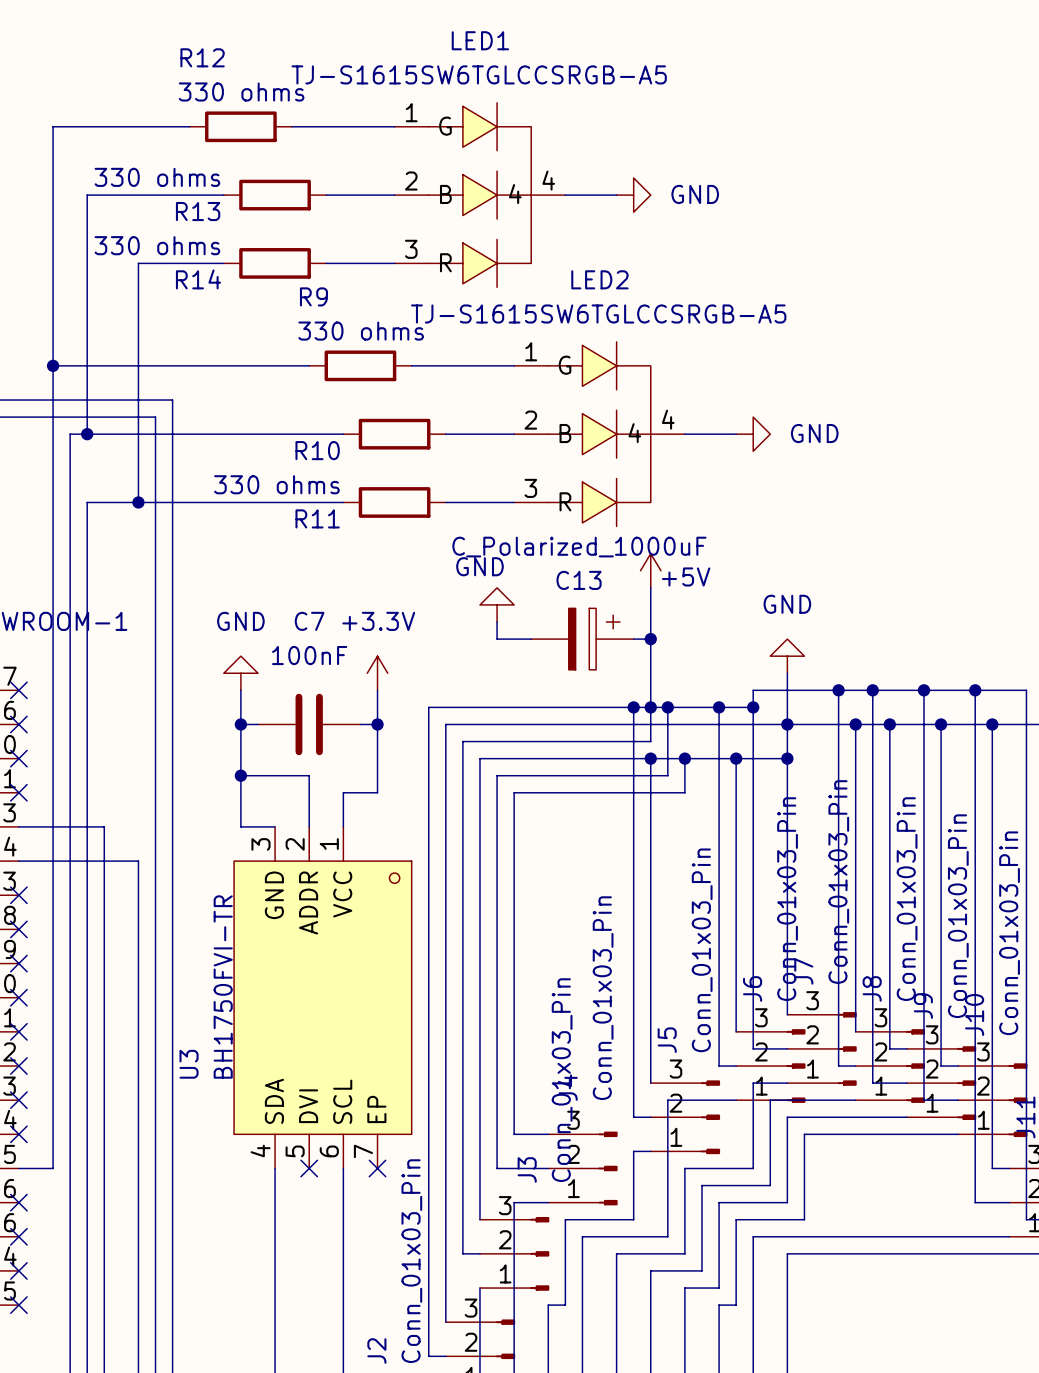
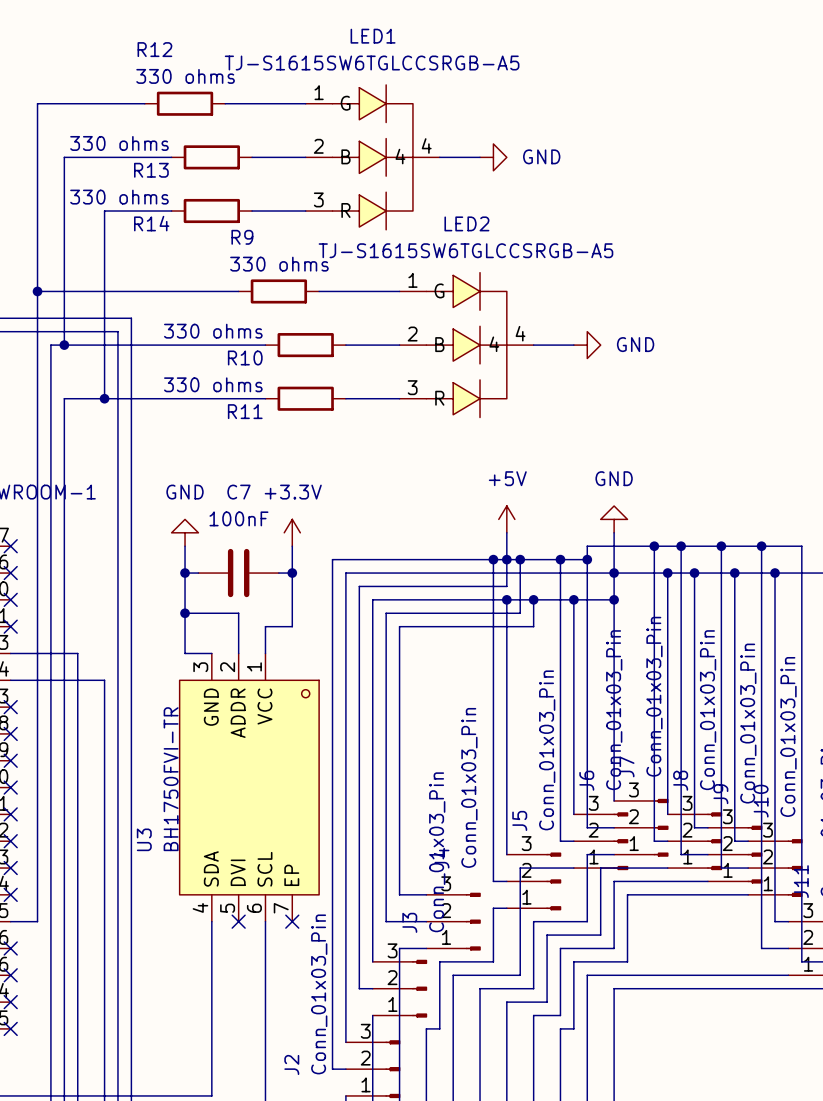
R10 value: none -> 330 ohms (213, 331)
power symbol position: +5V (650, 570) -> +5V (506, 519)
power symbol text position: +5V (686, 576) -> +5V (507, 478)
wire: (650, 587) (650, 673) -> none
power symbol: GND (497, 604) -> none
wire: (497, 622) (497, 639) (531, 639) -> none
C13: C_Polarized_1000uF (582, 639) -> none
wire: (633, 639) (650, 639) -> none
junction: (650, 639) -> none

